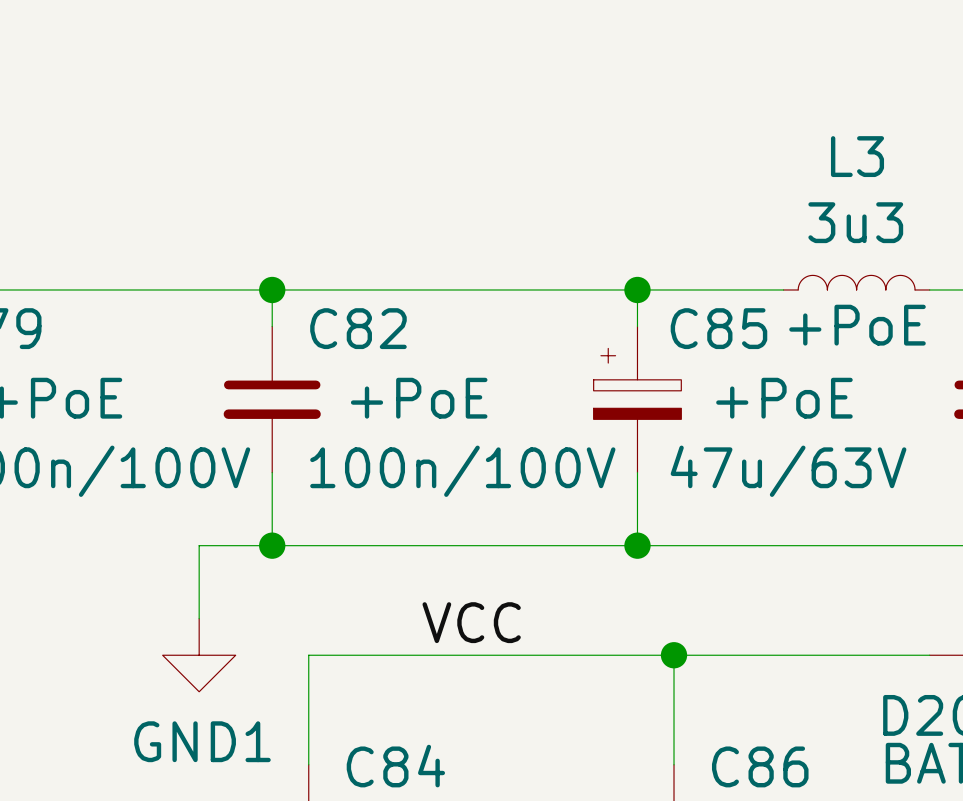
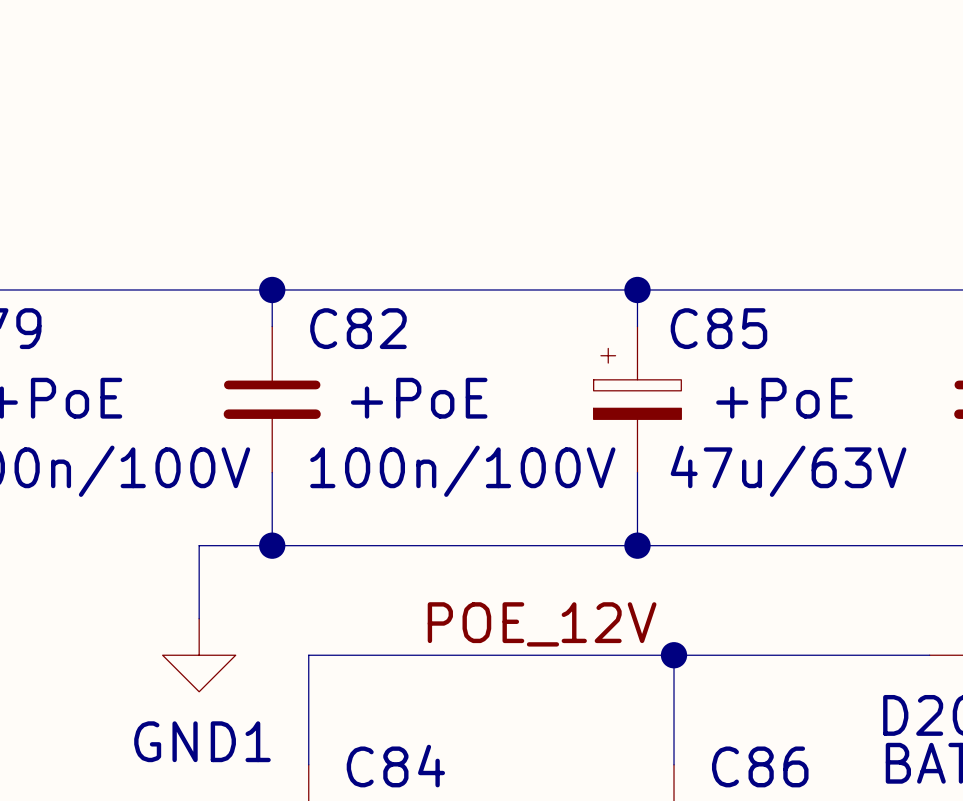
L3: 3u3 (856, 282) -> none
wire: none -> (783, 289) (929, 289)
label: VCC (471, 622) -> POE_12V (542, 624)

